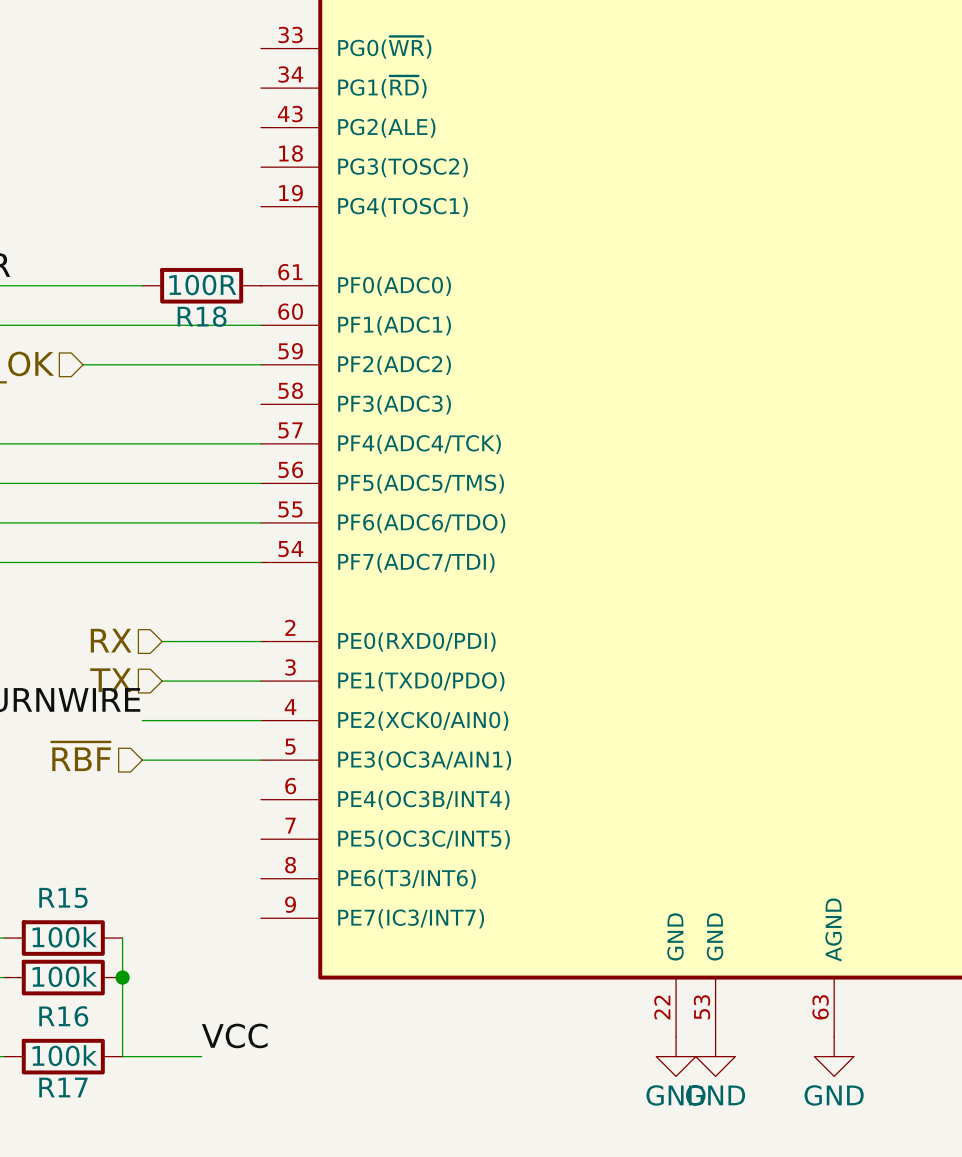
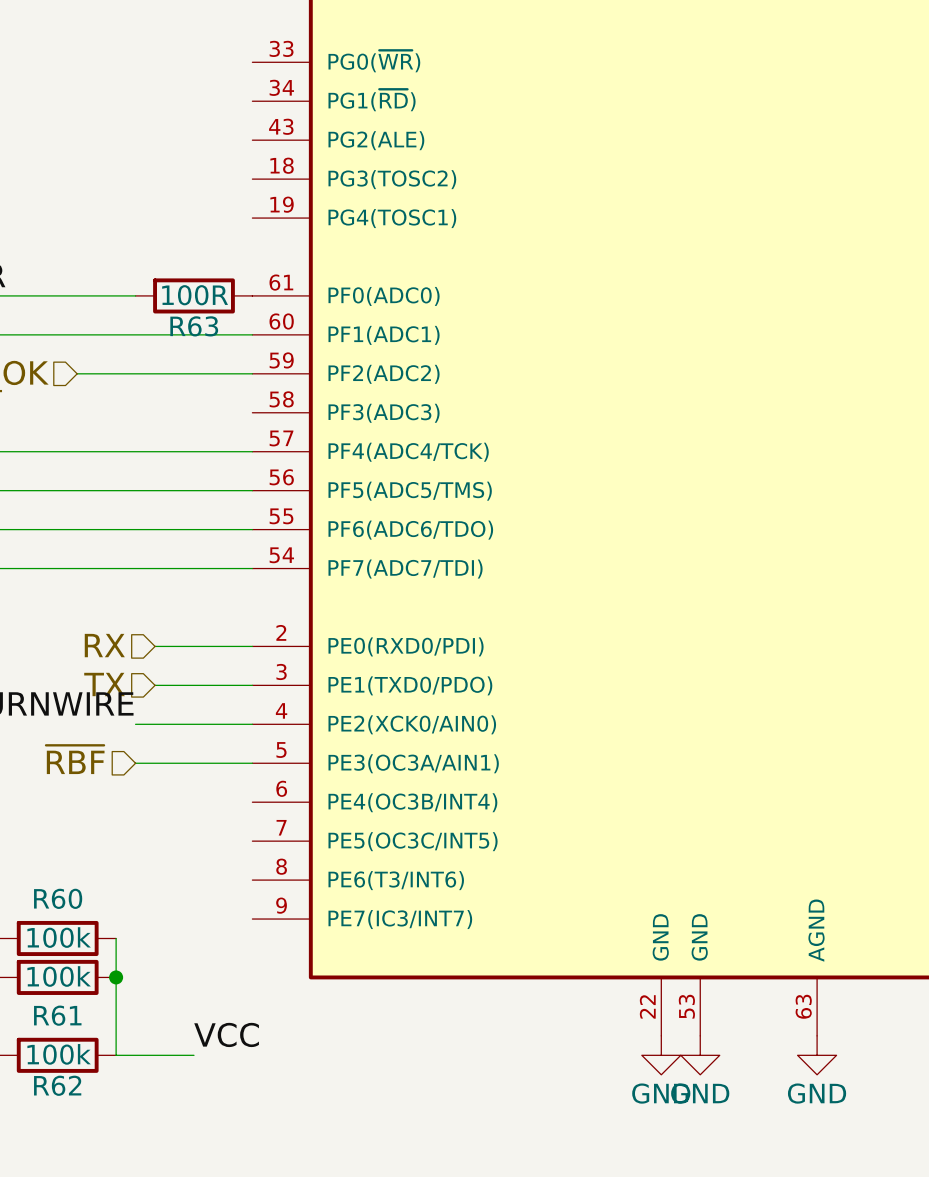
R18 name: R18 (202, 316) -> R63 (194, 326)
R15 name: R15 (63, 897) -> R60 (58, 898)
R16 name: R16 (63, 1016) -> R61 (57, 1015)
R17 name: R17 (63, 1087) -> R62 (57, 1085)

